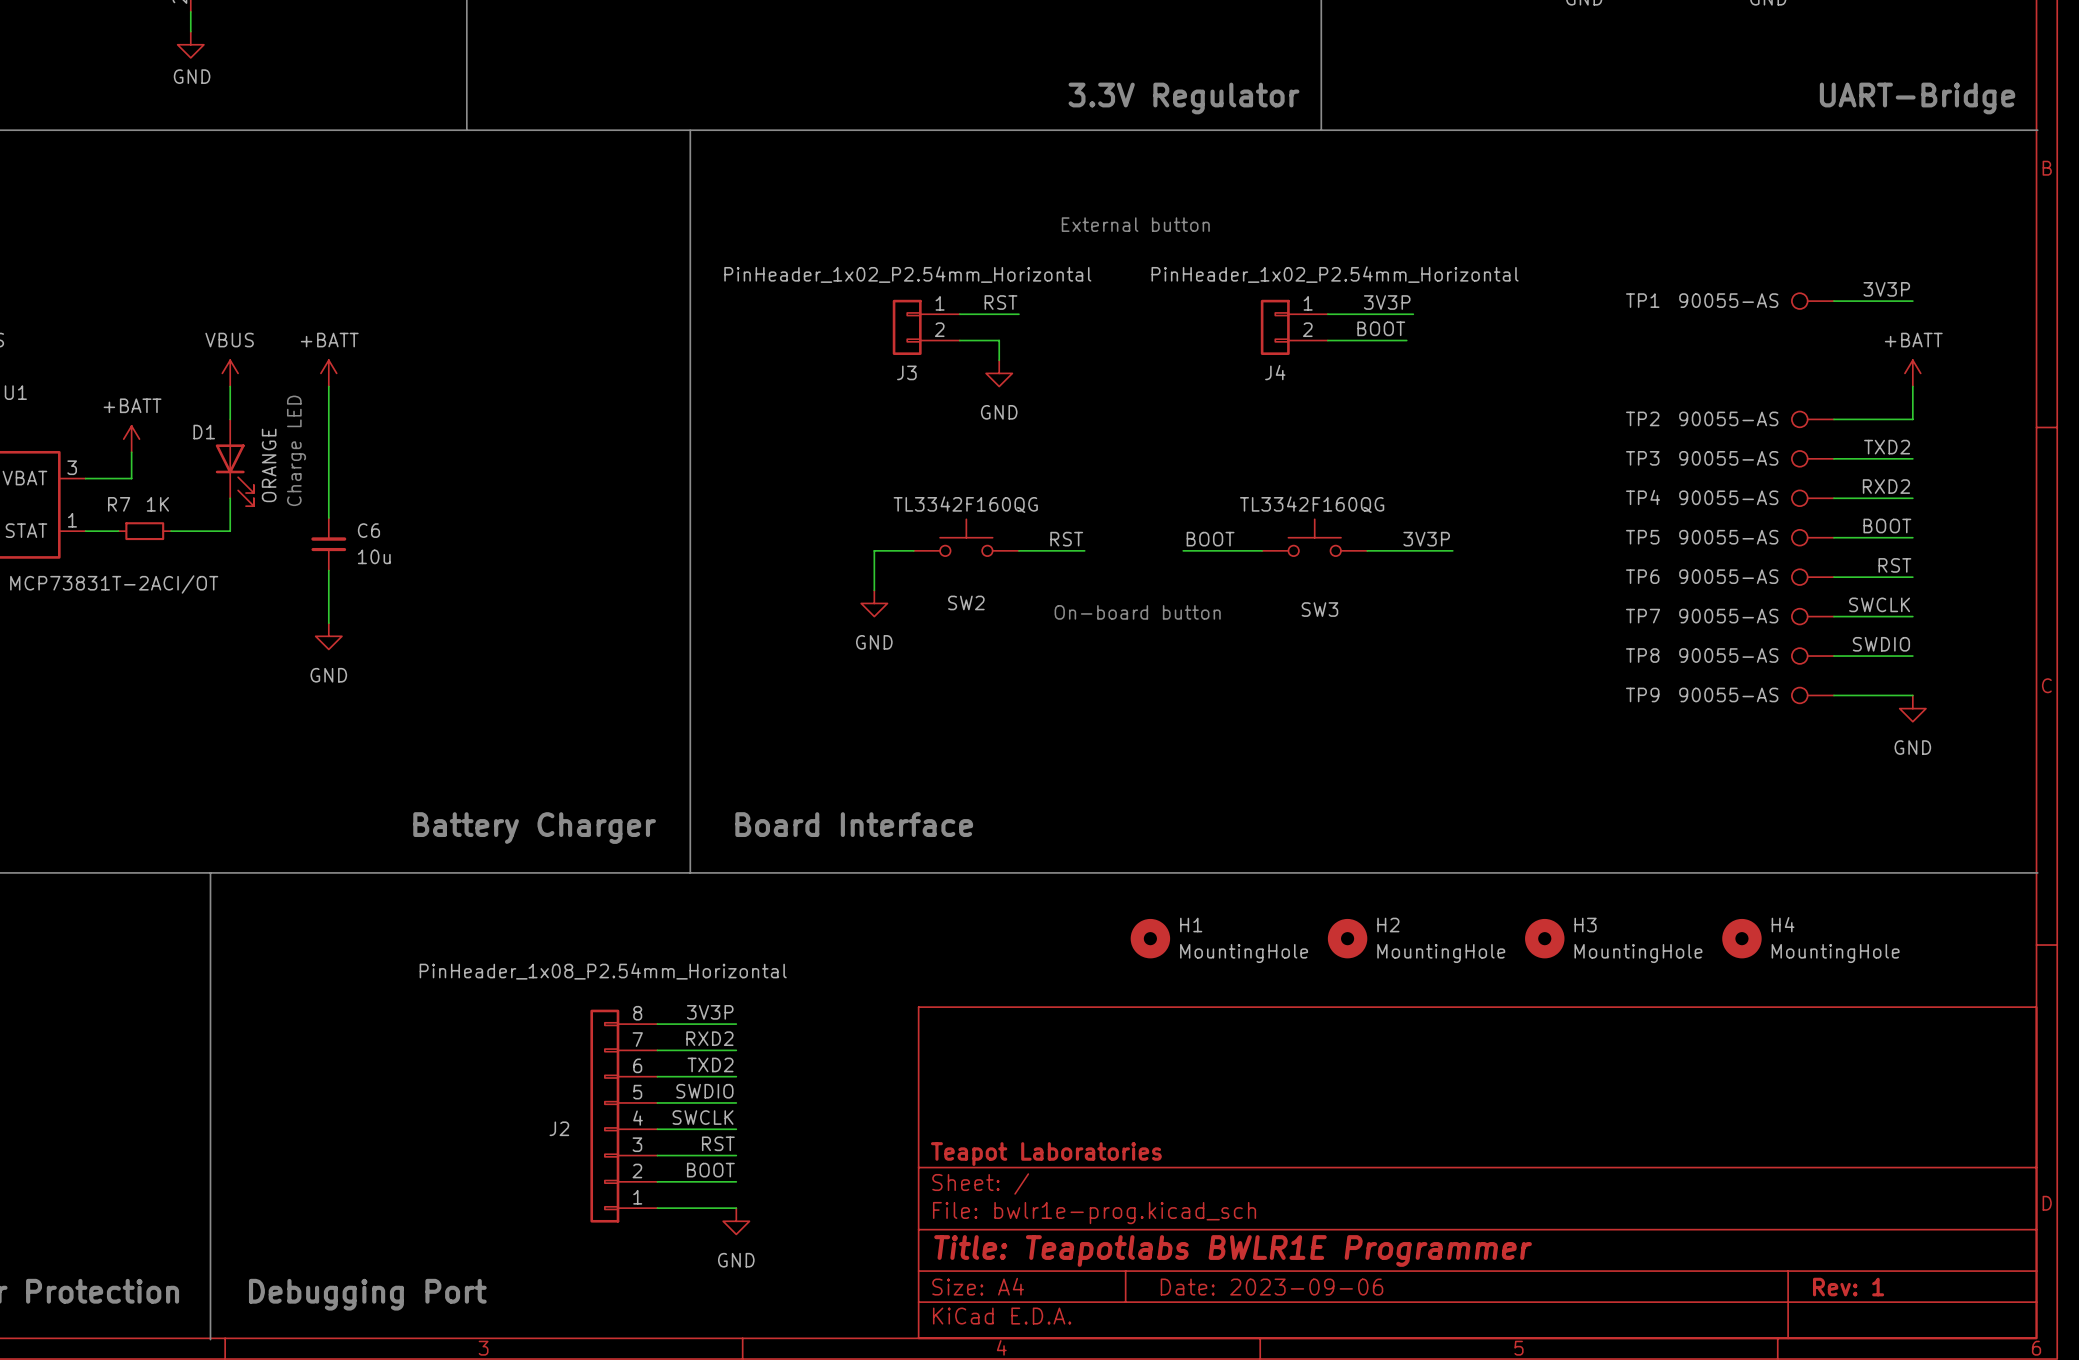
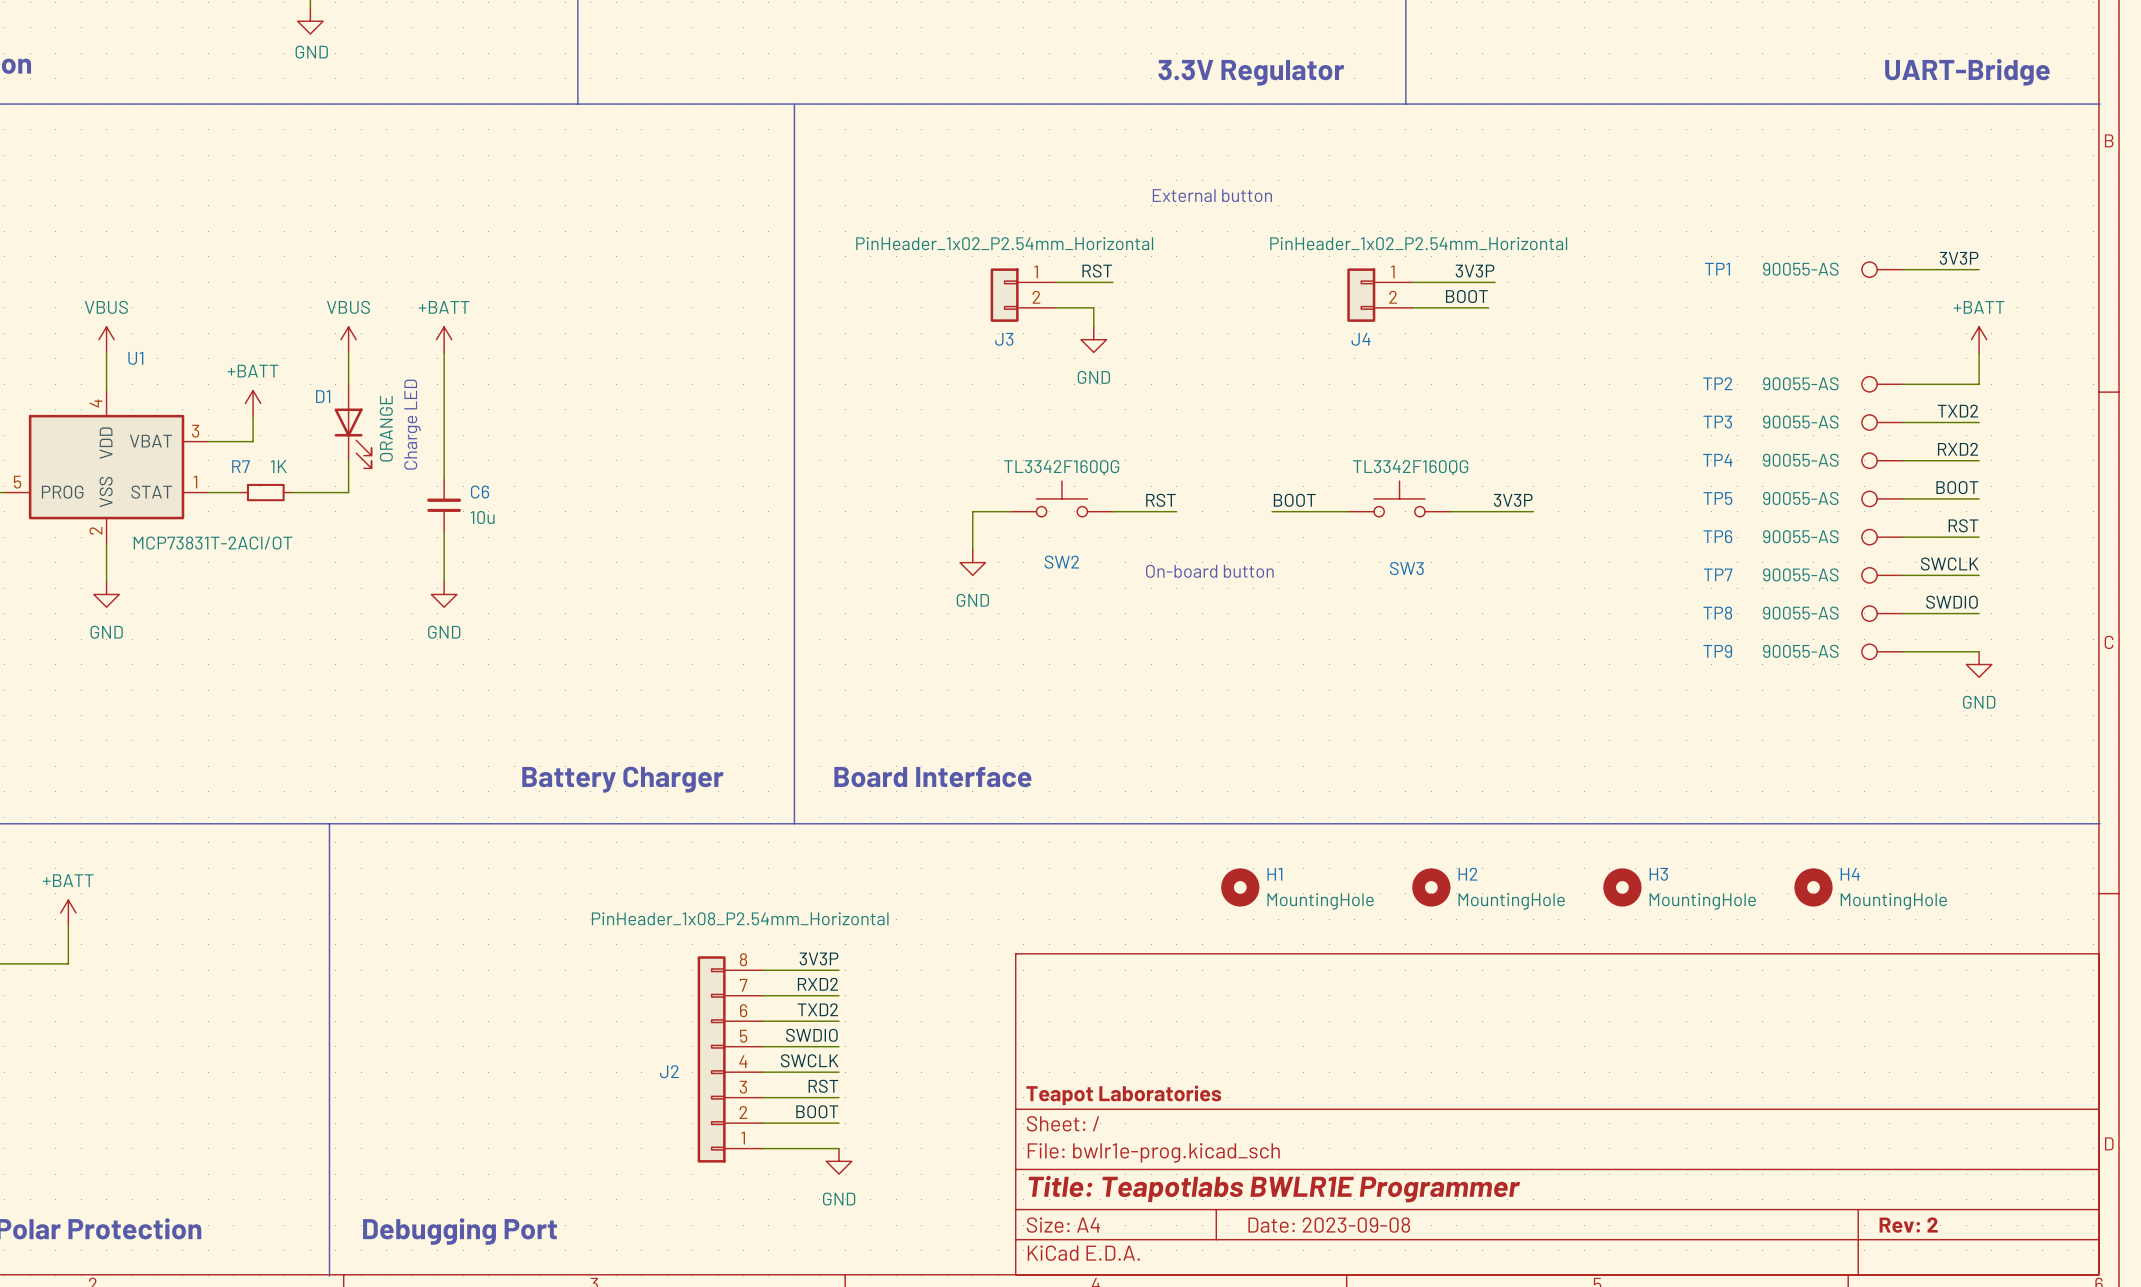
title block: Date: 2023-09-06 (1271, 1287) -> Date: 2023-09-08 (1329, 1225)
title block: Rev: 1 (1848, 1287) -> Rev: 2 (1908, 1225)

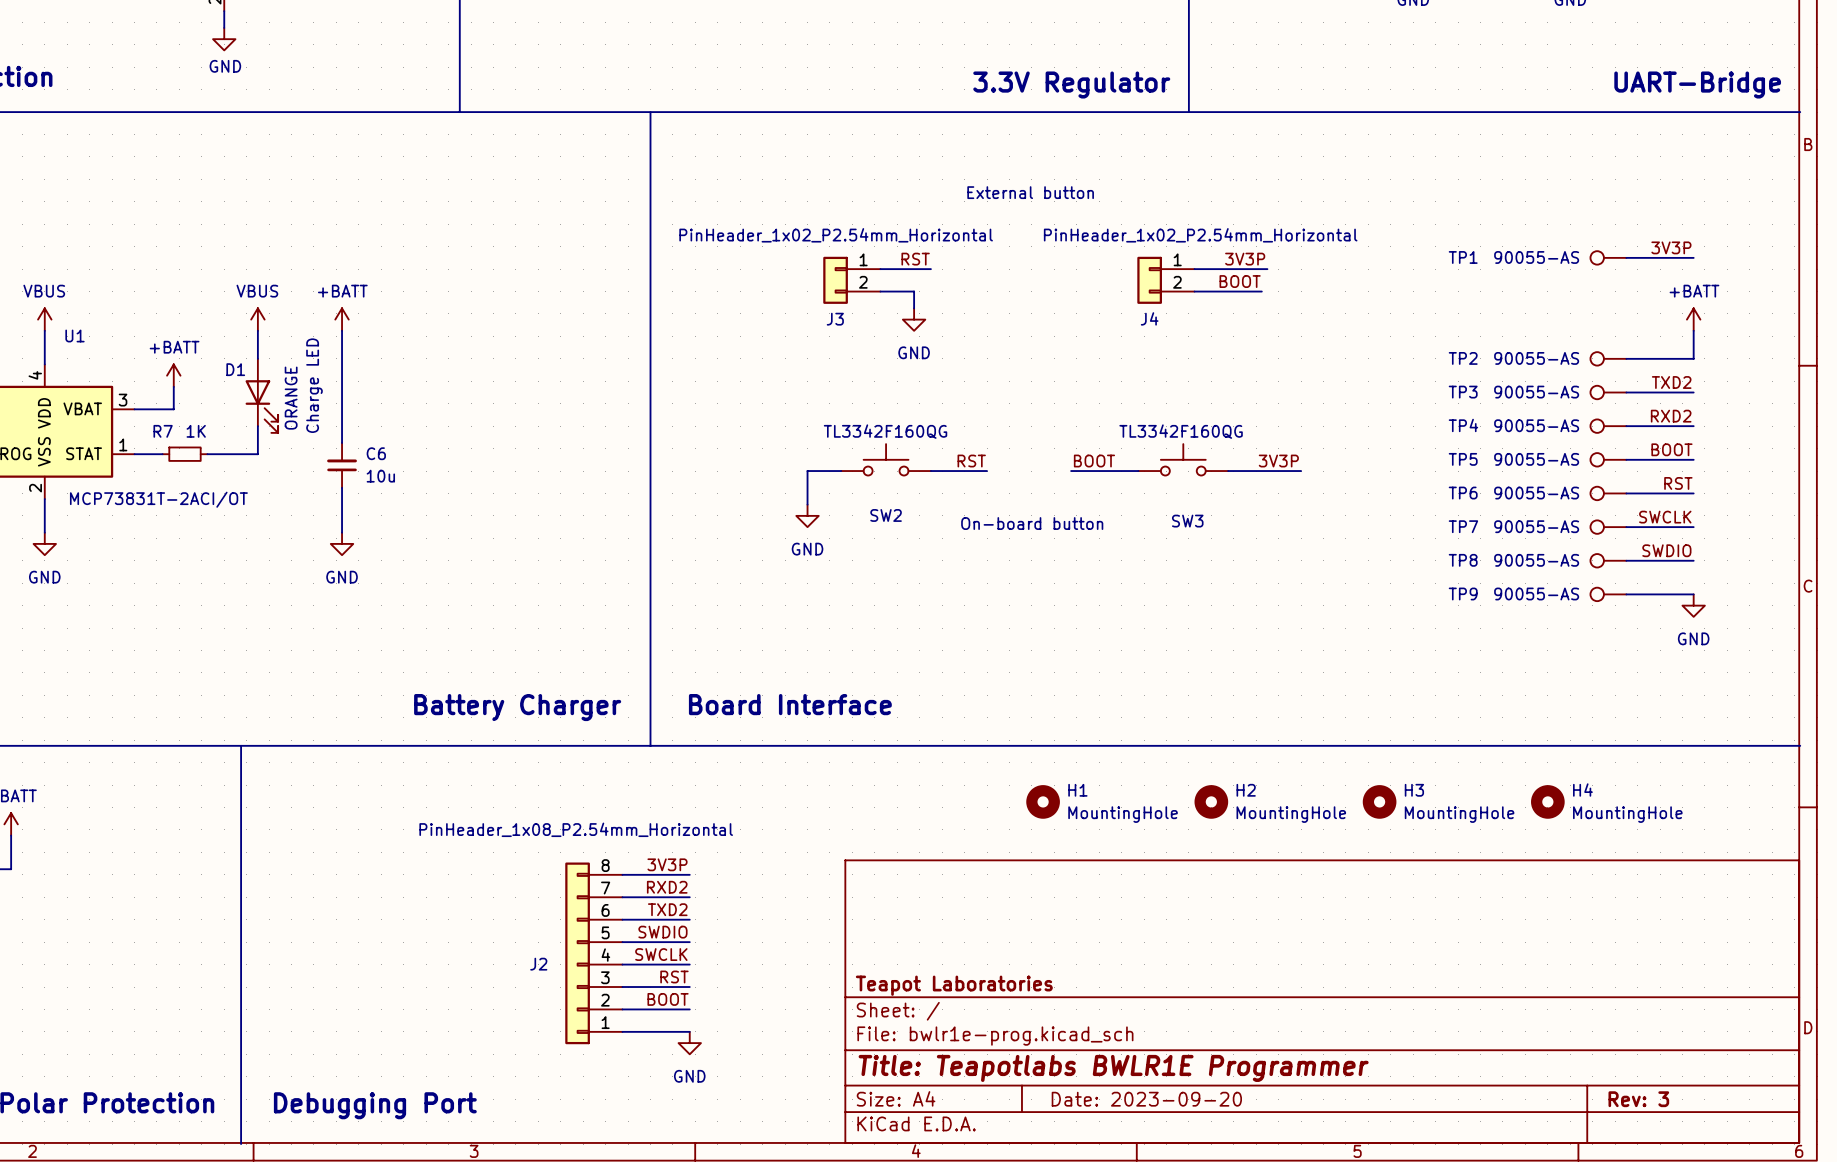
title block: Date: 2023-09-08 (1329, 1225) -> Date: 2023-09-20 (1146, 1099)
title block: Rev: 2 (1908, 1225) -> Rev: 3 (1638, 1099)

